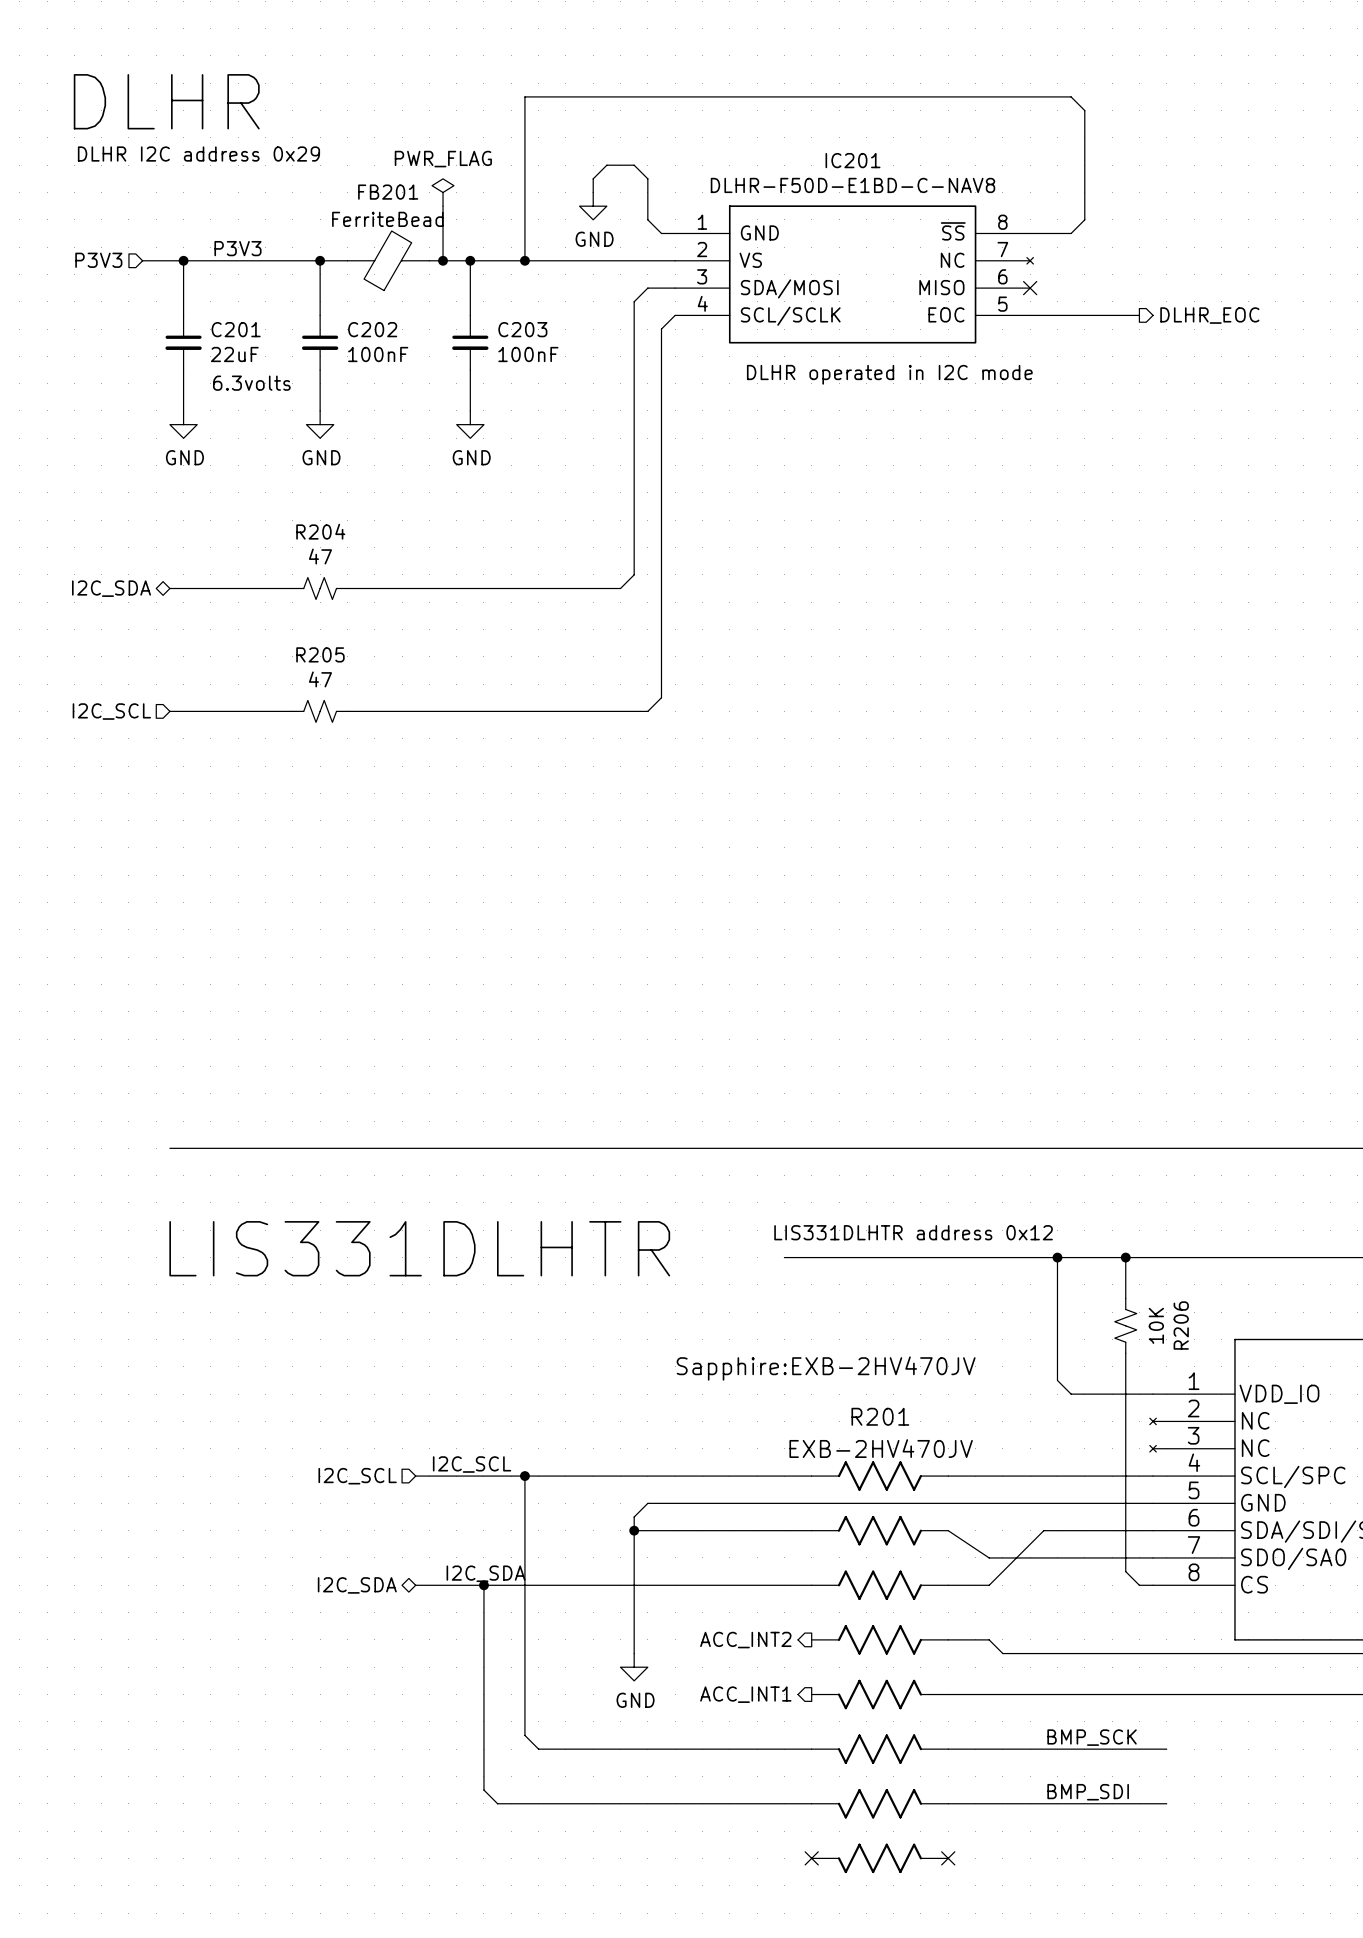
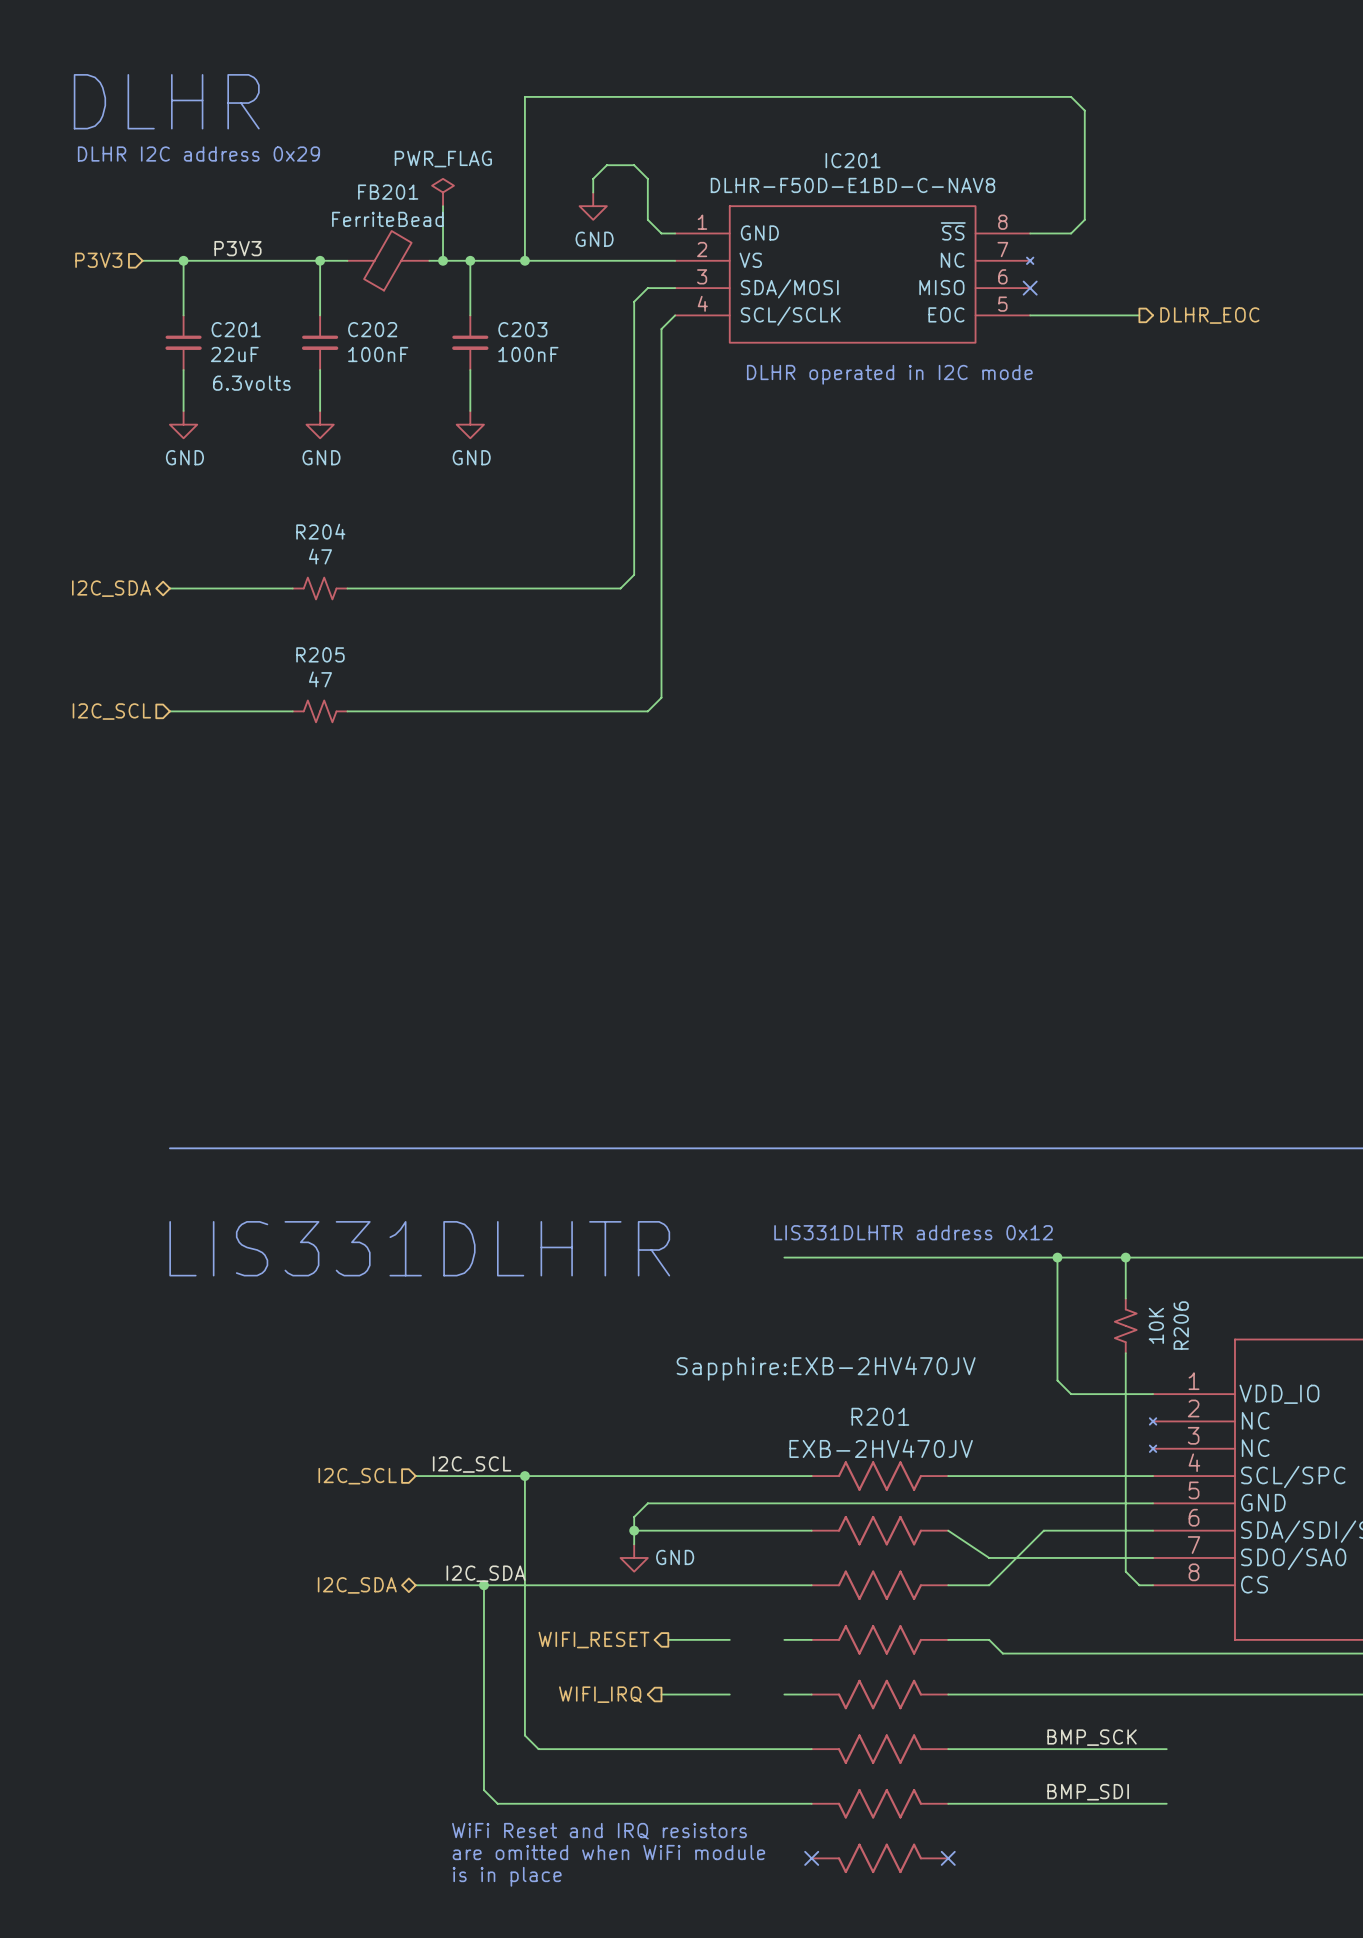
wire: (634, 1544) (634, 1653) -> none
wire: none -> (668, 1639) (729, 1639)
wire: none -> (784, 1639) (811, 1639)
hierarchical label: none -> WIFI_RESET (593, 1640)
hierarchical label: ACC_INT2 (745, 1640) -> none
power symbol position: GND (634, 1667) -> GND (634, 1557)
hierarchical label: none -> WIFI_IRQ (600, 1694)
wire: none -> (661, 1694) (729, 1694)
hierarchical label: ACC_INT1 (745, 1694) -> none
wire: none -> (784, 1694) (811, 1694)
power symbol text position: GND (635, 1700) -> GND (675, 1557)
text: none -> WiFi Reset and IRQ resistors (599, 1831)
text: none -> are omitted when WiFi module (608, 1852)
text: none -> is in place (507, 1876)

